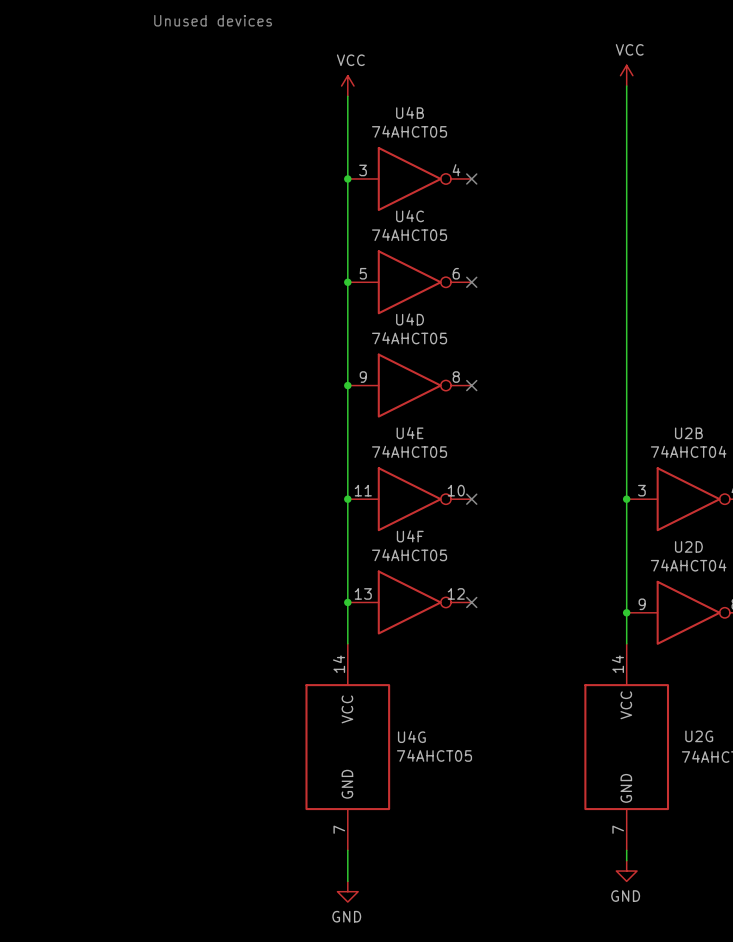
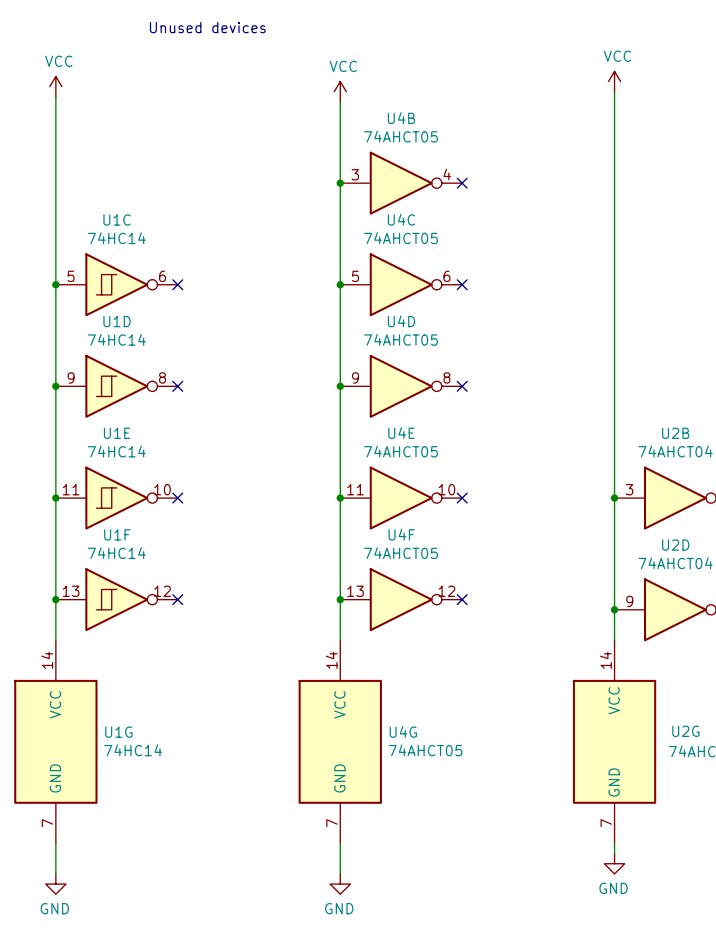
power symbol: none -> VCC (55, 86)
wire: none -> (55, 96) (55, 640)
junction: none -> (55, 284)
U1C: none -> 74HC14 (116, 284)
no-connect mark: none -> (177, 284)
junction: none -> (55, 386)
U1D: none -> 74HC14 (116, 386)
no-connect mark: none -> (177, 386)
junction: none -> (55, 498)
U1E: none -> 74HC14 (116, 498)
no-connect mark: none -> (177, 498)
junction: none -> (55, 599)
U1F: none -> 74HC14 (116, 599)
no-connect mark: none -> (177, 599)
U1G: none -> 74HC14 (55, 741)
wire: none -> (55, 843) (55, 873)
power symbol: none -> GND (55, 884)

